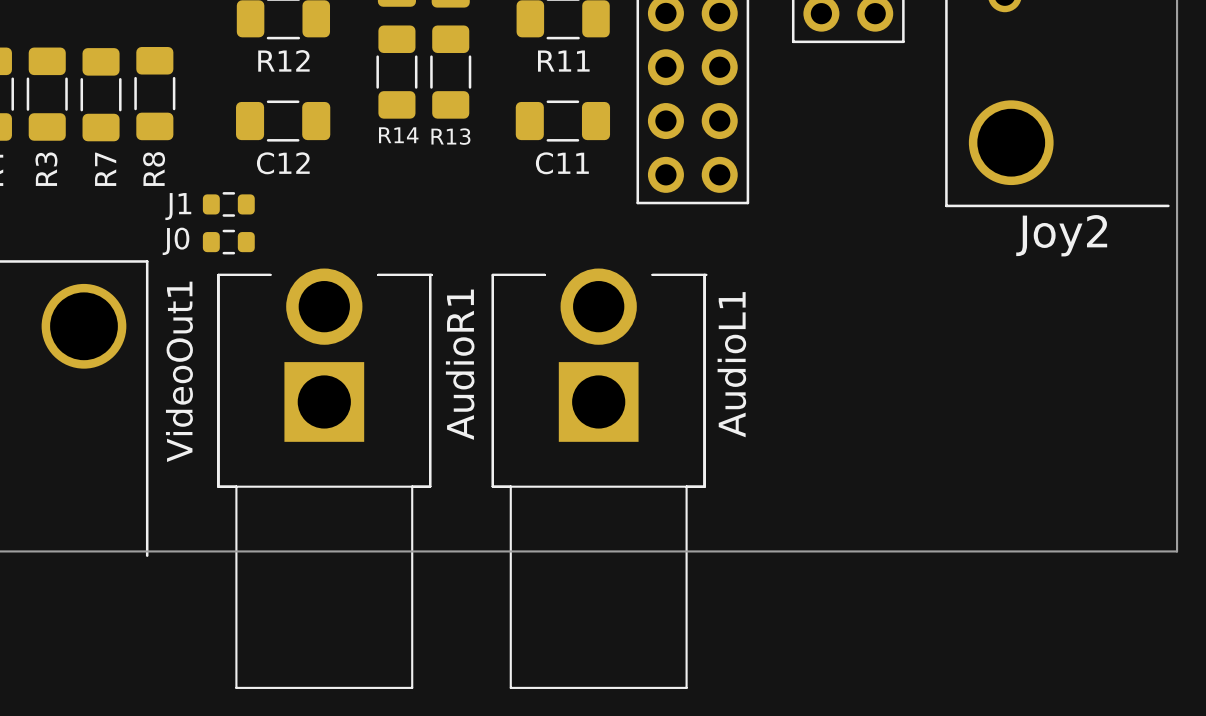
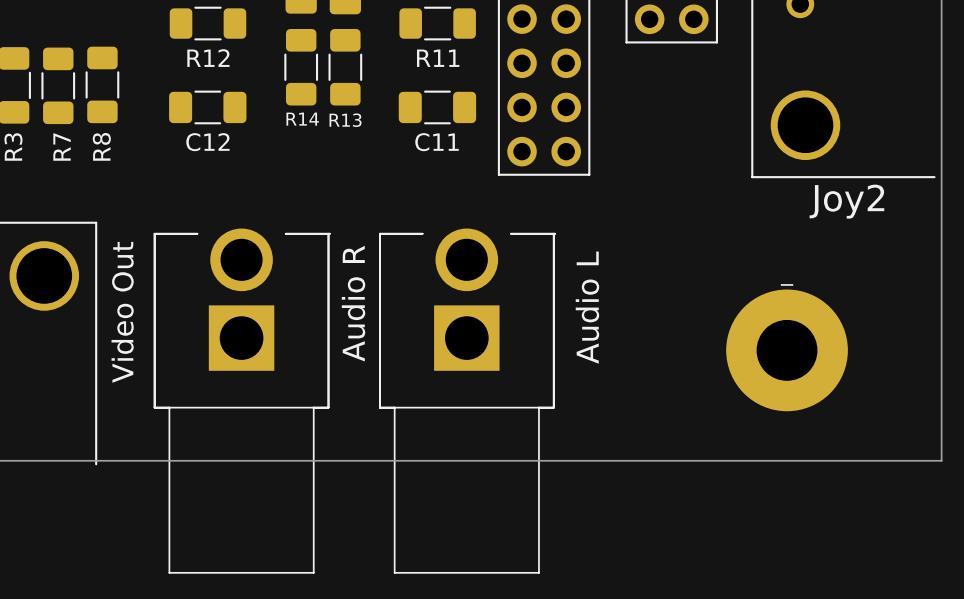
J1: (228, 204) -> none
J0: (228, 242) -> none
AudioR1 name: AudioR1 (460, 364) -> Audio R (353, 303)
AudioL1 name: AudioL1 (731, 364) -> Audio L (587, 307)
VideoOut1 name: VideoOut1 (179, 371) -> Video Out (122, 312)
part: none -> (787, 350)

